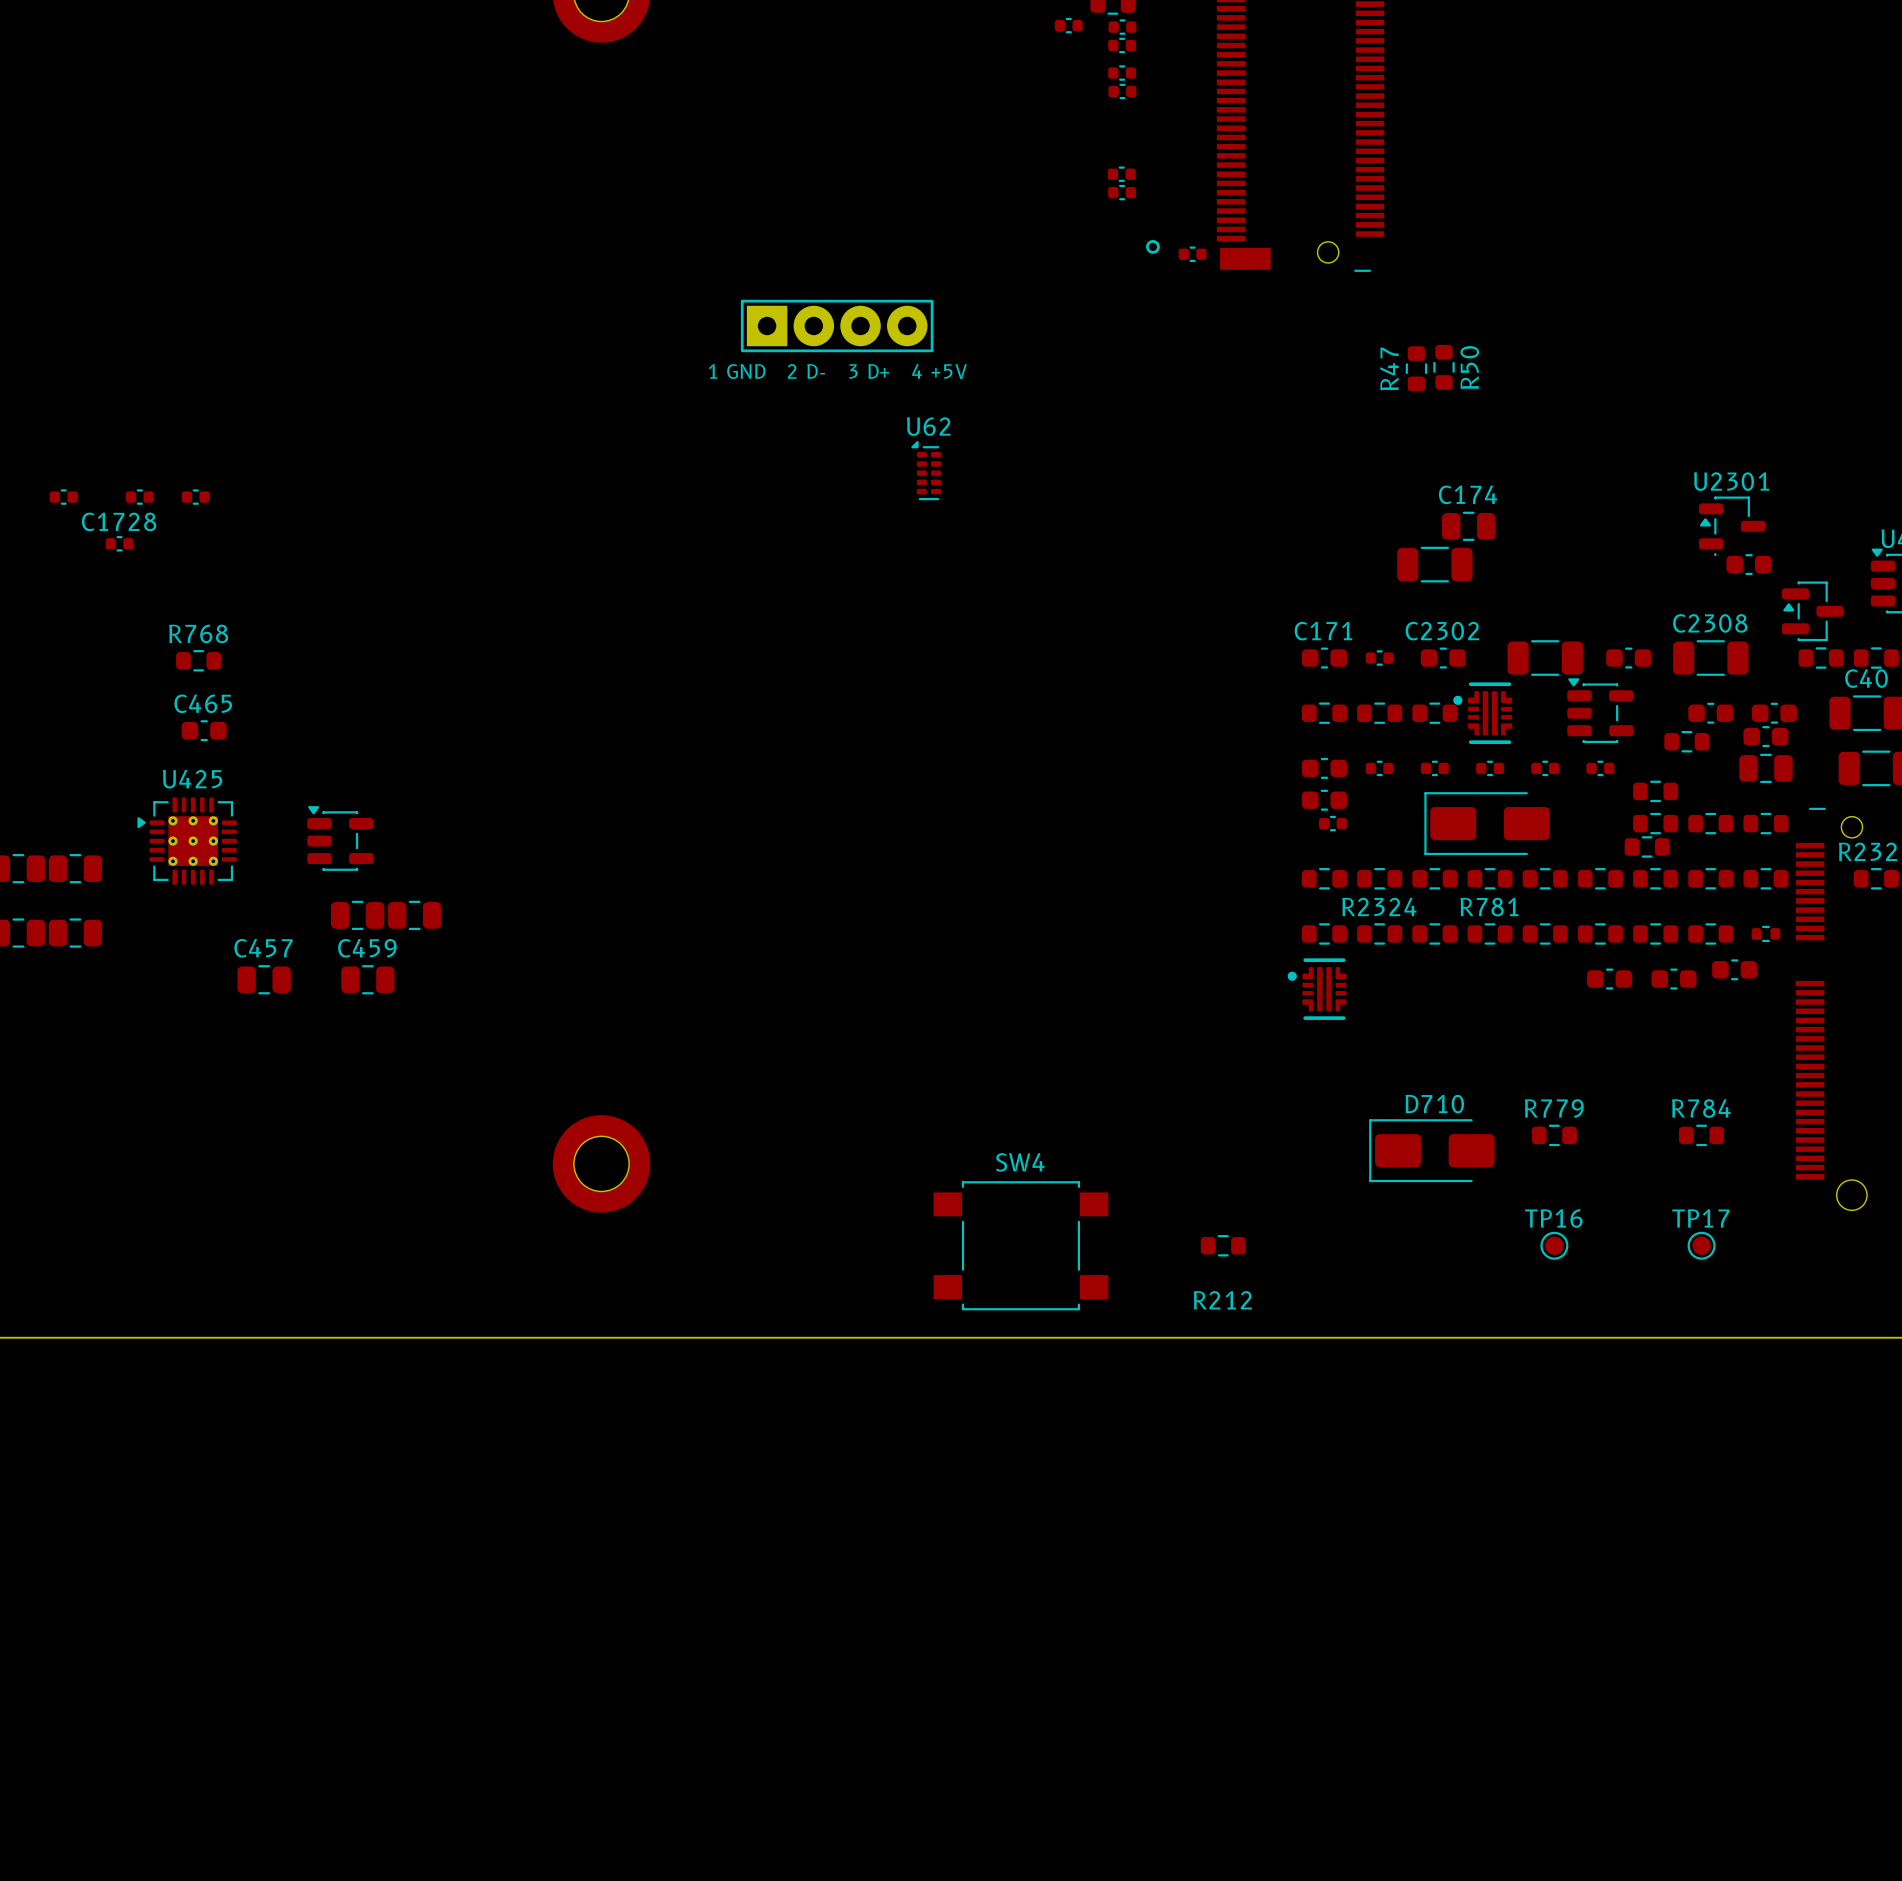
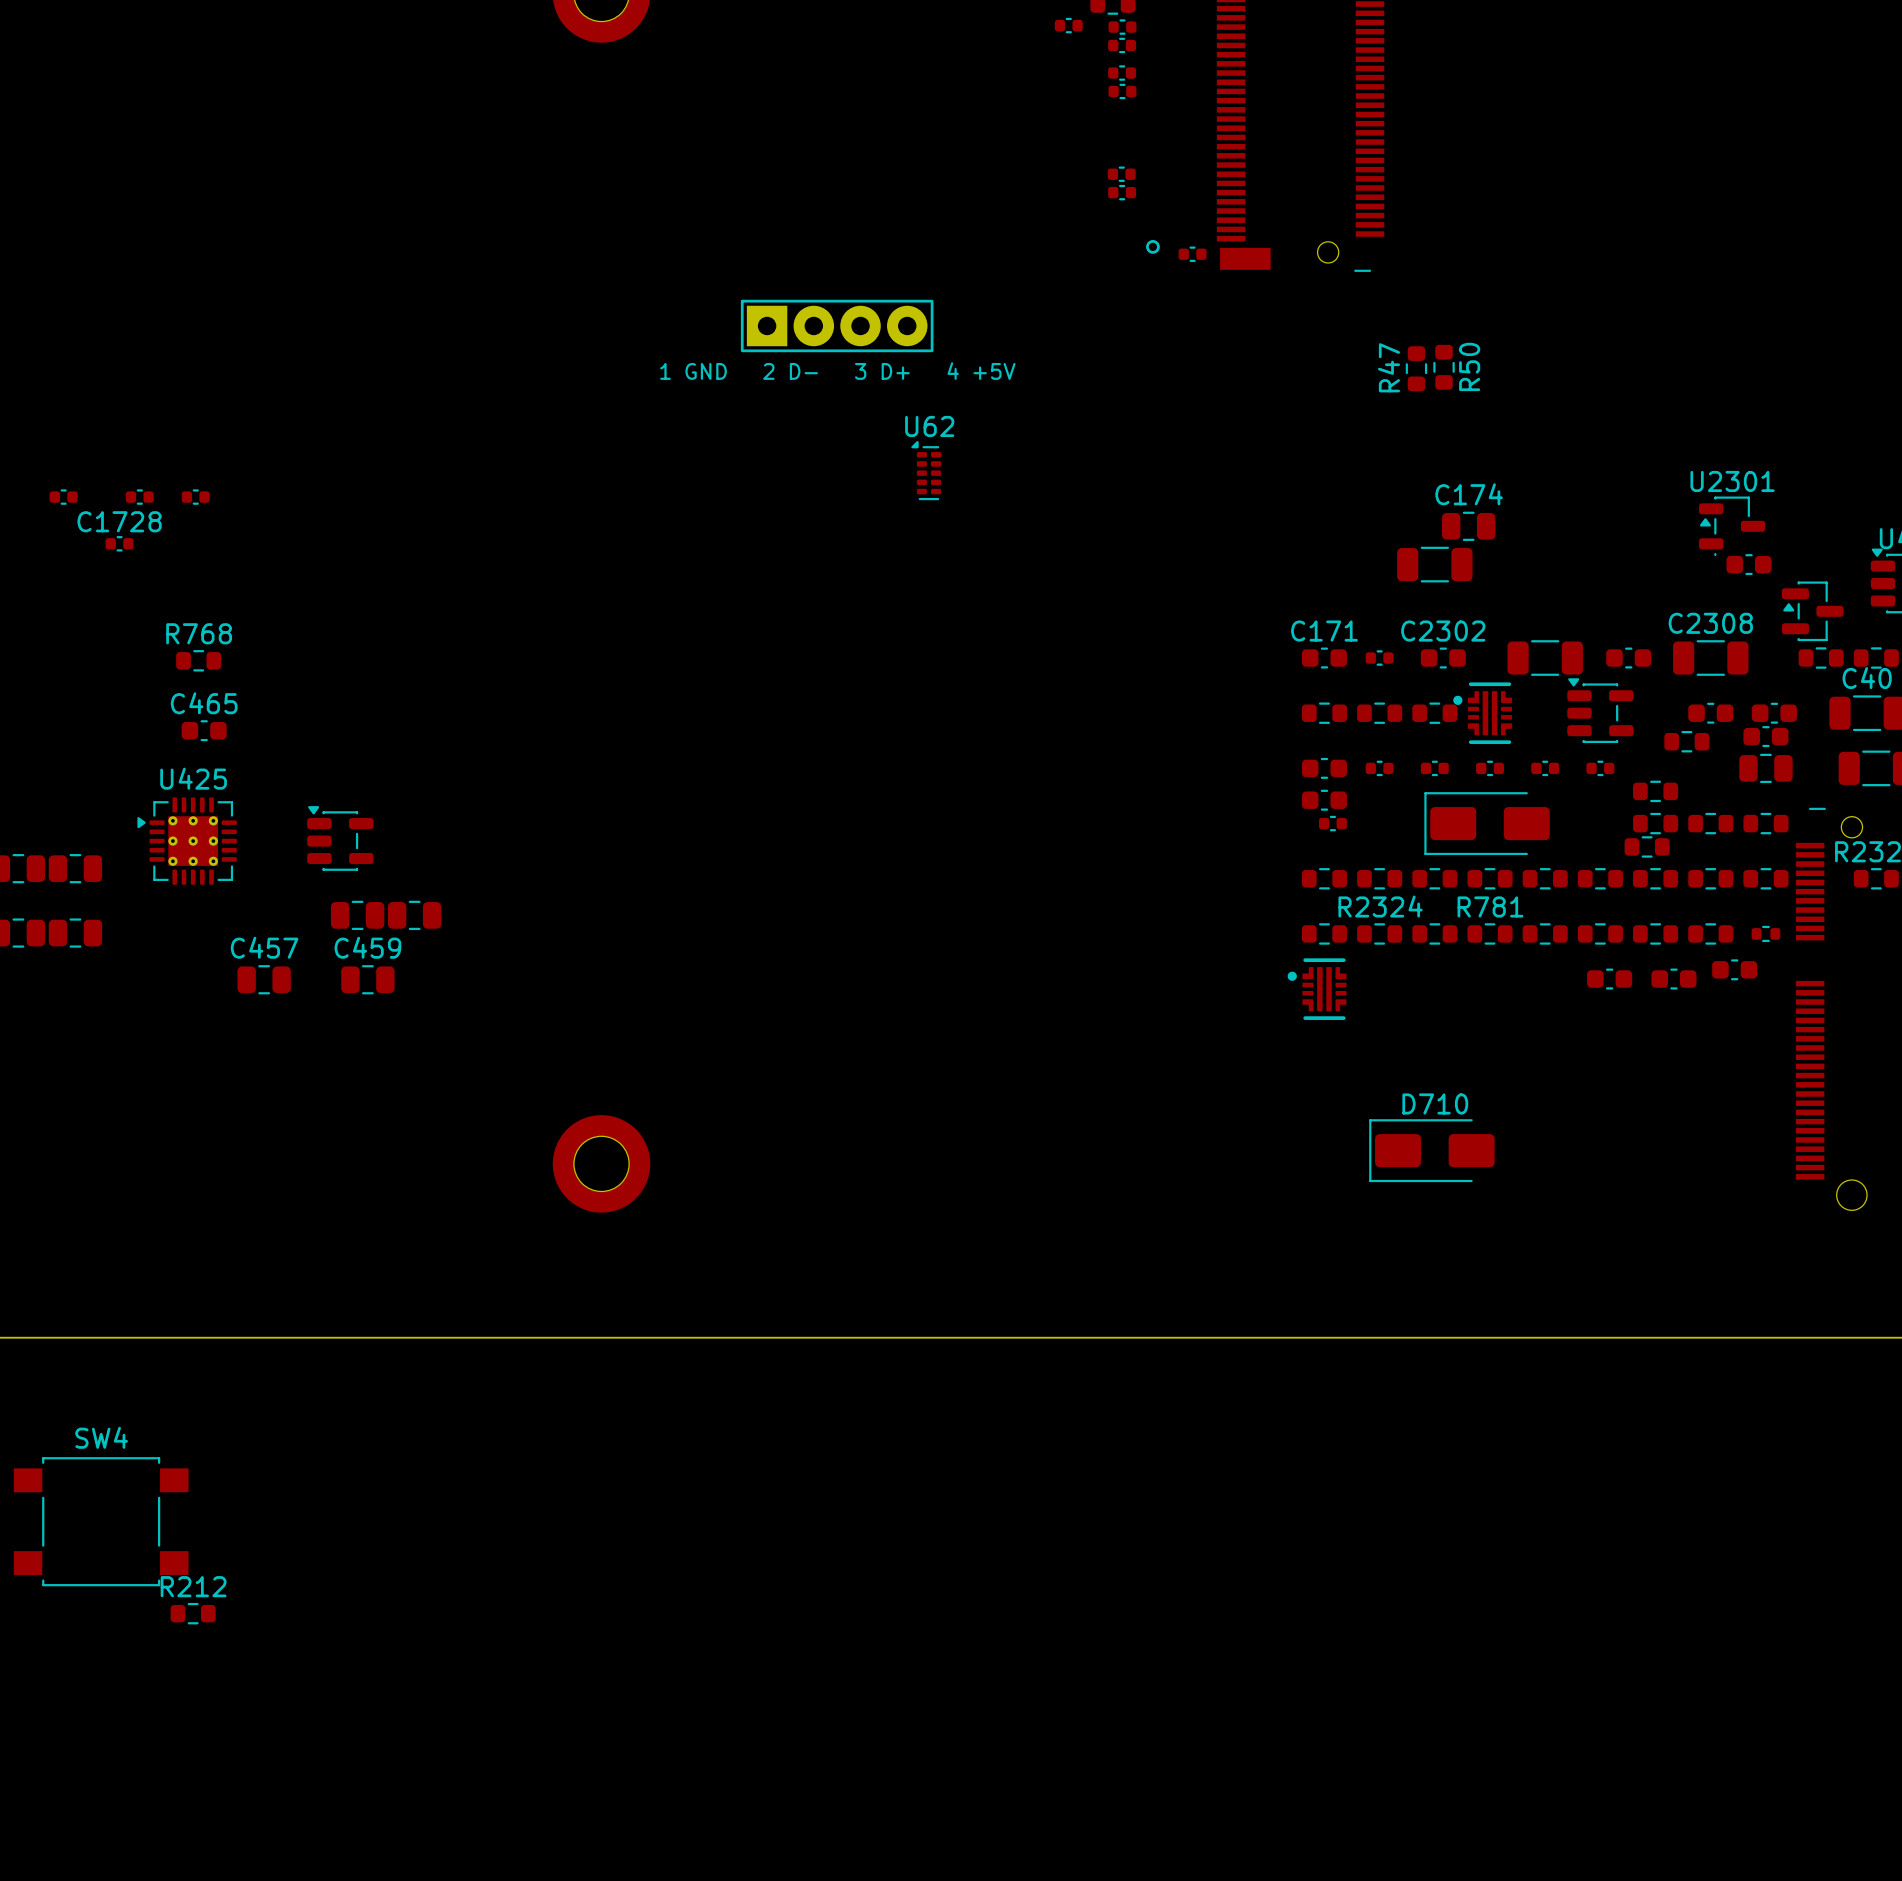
R779: (1554, 1135) -> none
R784: (1701, 1135) -> none
SW4 position: (1020, 1245) -> (101, 1521)
R212 position: (1223, 1245) -> (193, 1613)
TP16: (1554, 1245) -> none
TP17: (1701, 1245) -> none
R212 name position: R212 (1222, 1300) -> R212 (193, 1586)

